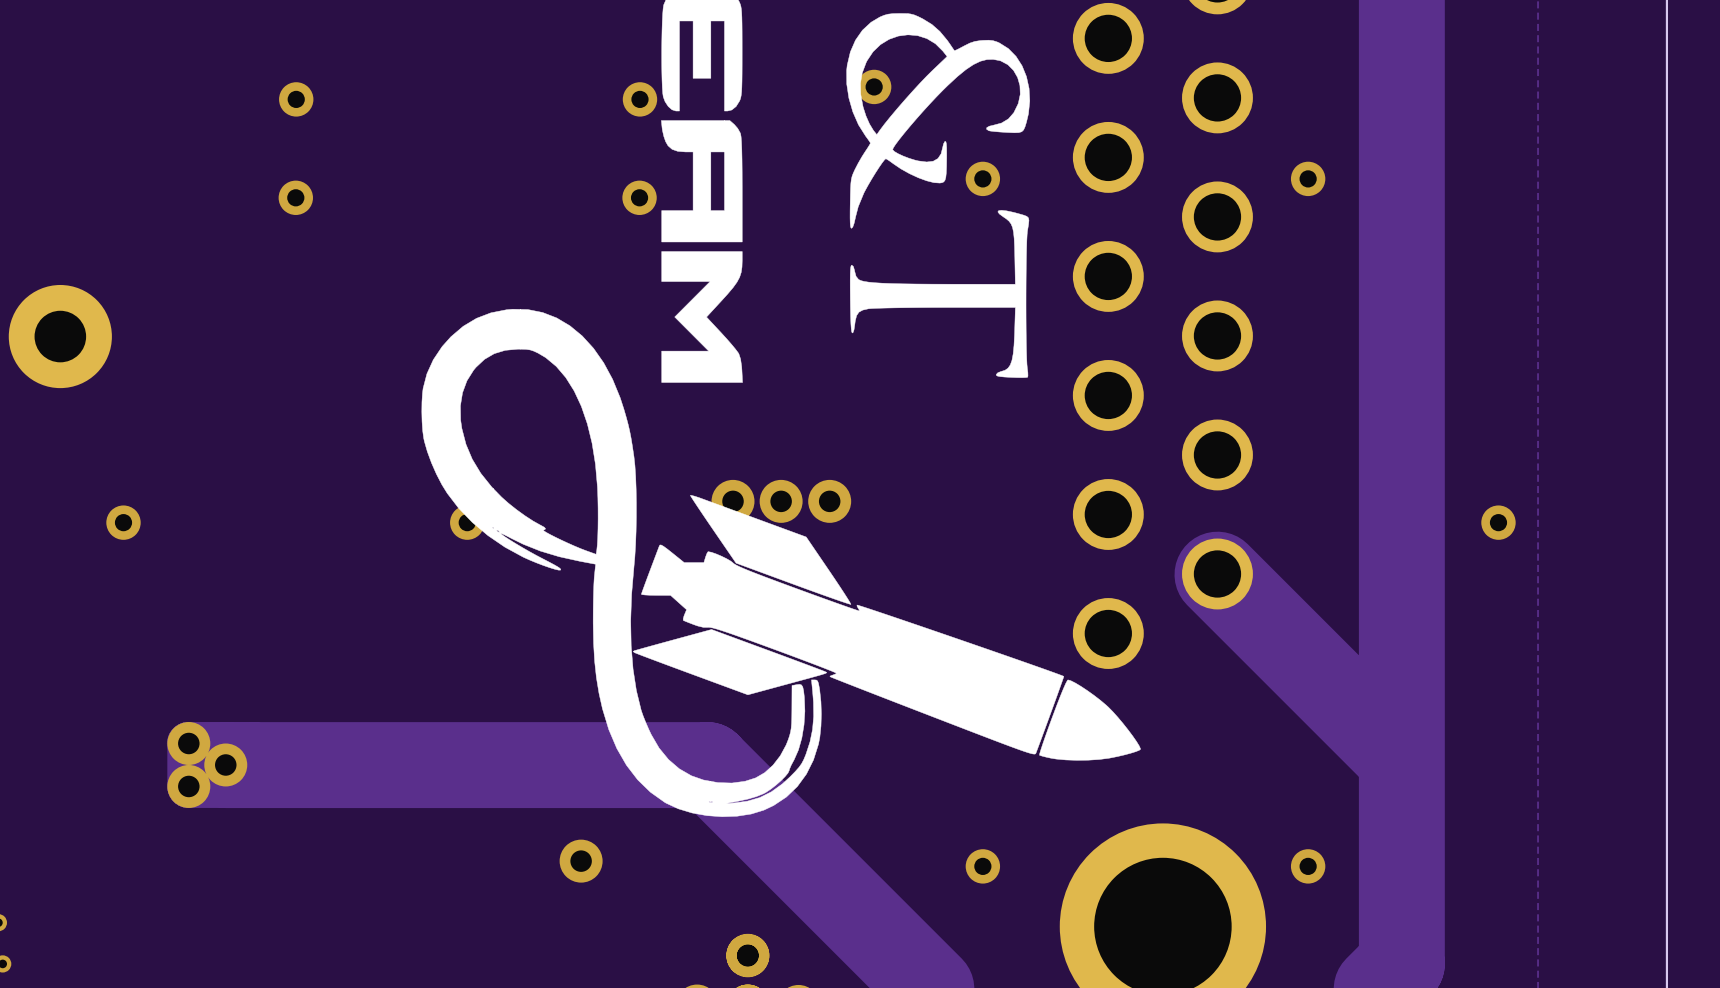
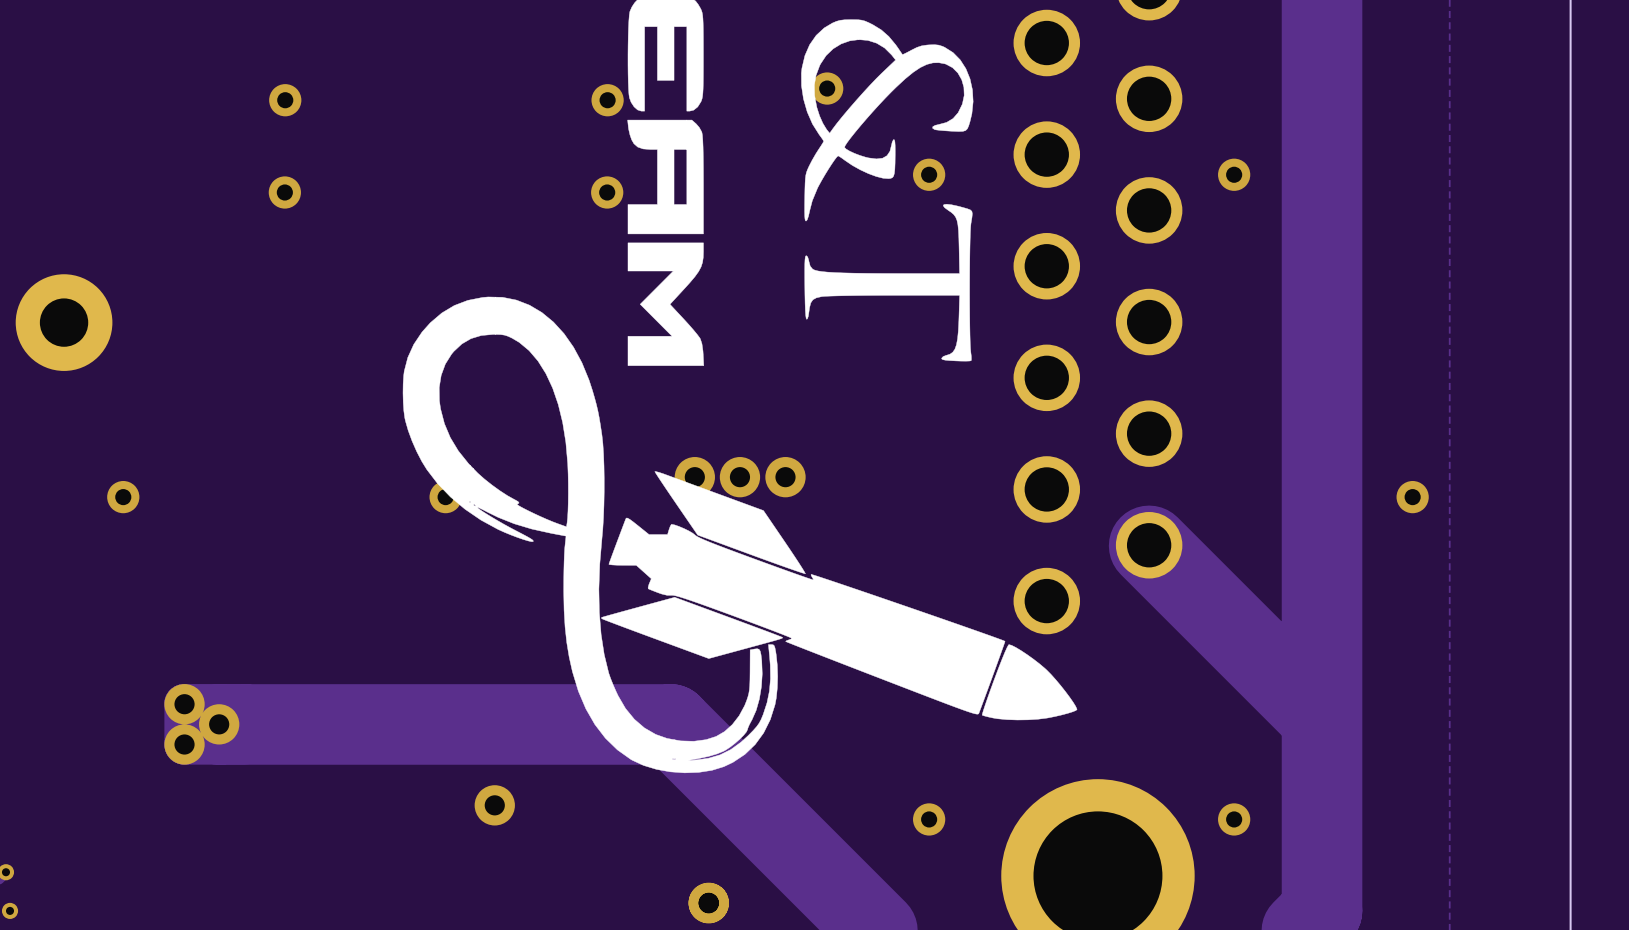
via position: (581, 861) -> (494, 805)

